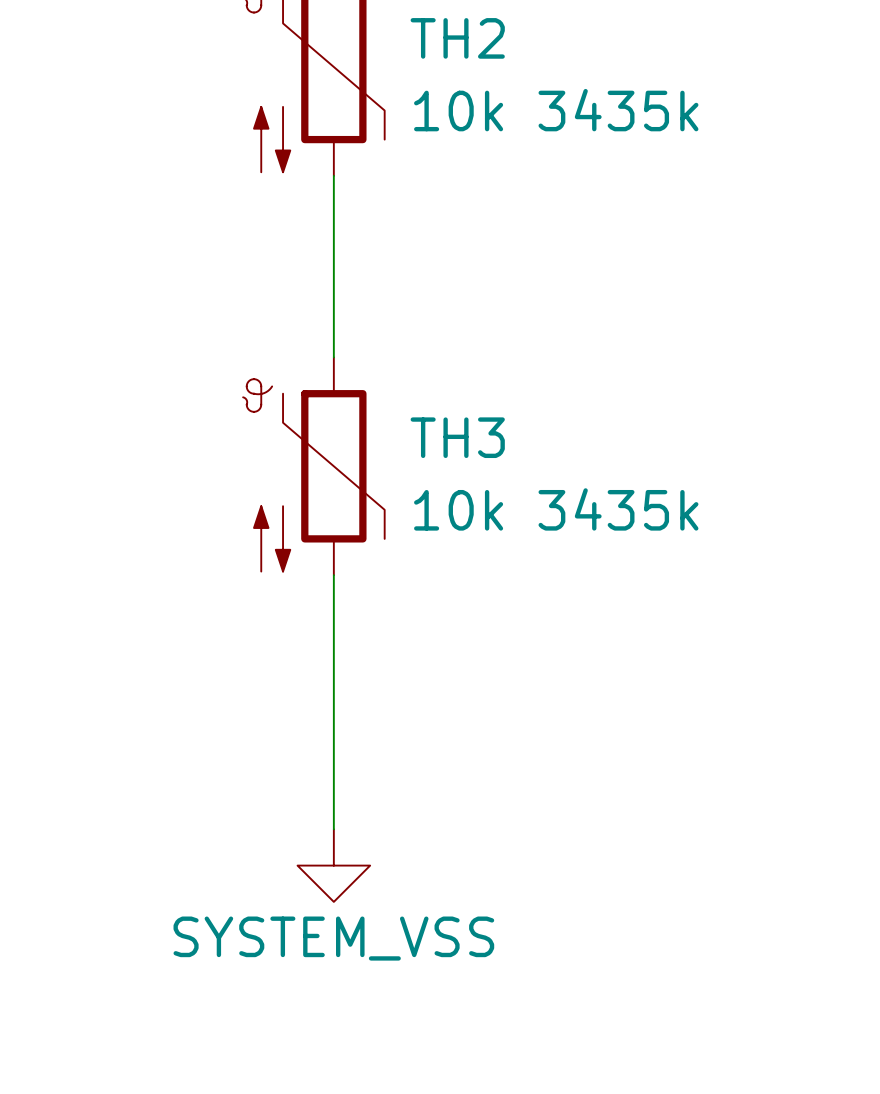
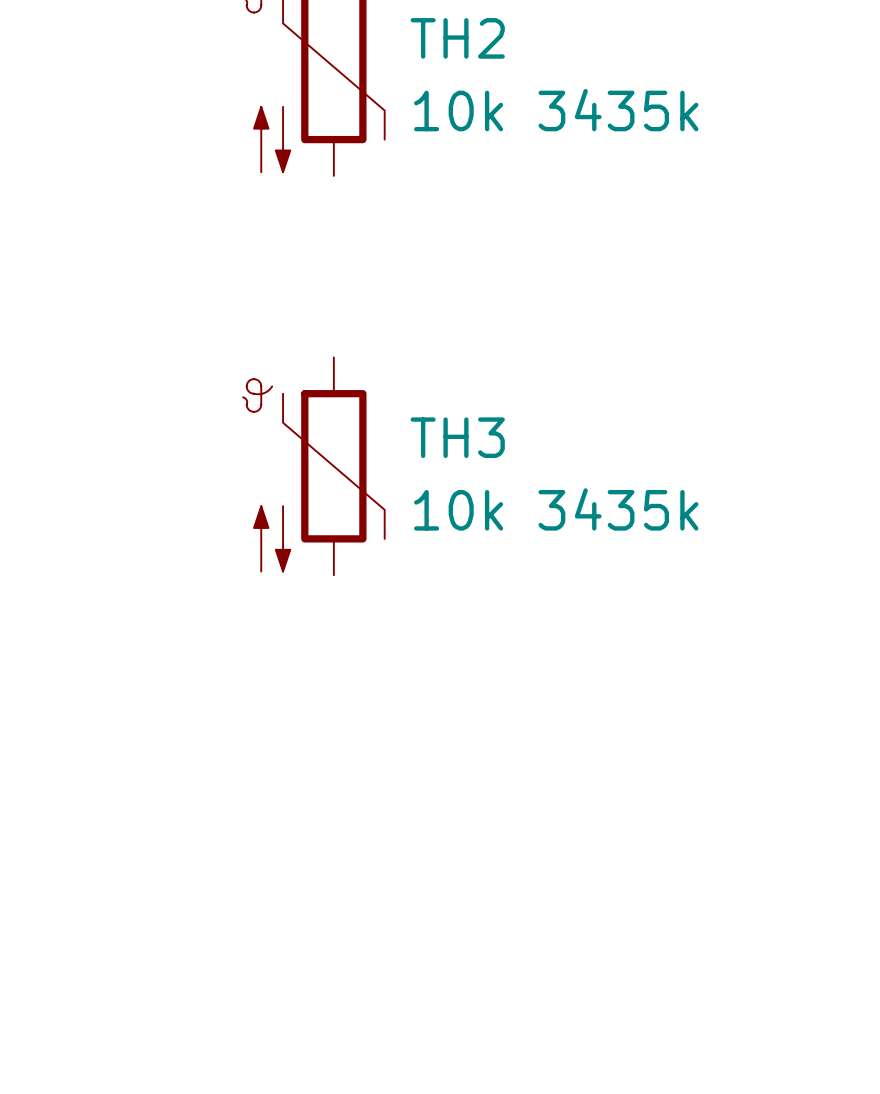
wire: (333, 175) (333, 357) -> none
wire: (333, 575) (333, 829) -> none
power symbol: SYSTEM_VSS (333, 865) -> none

